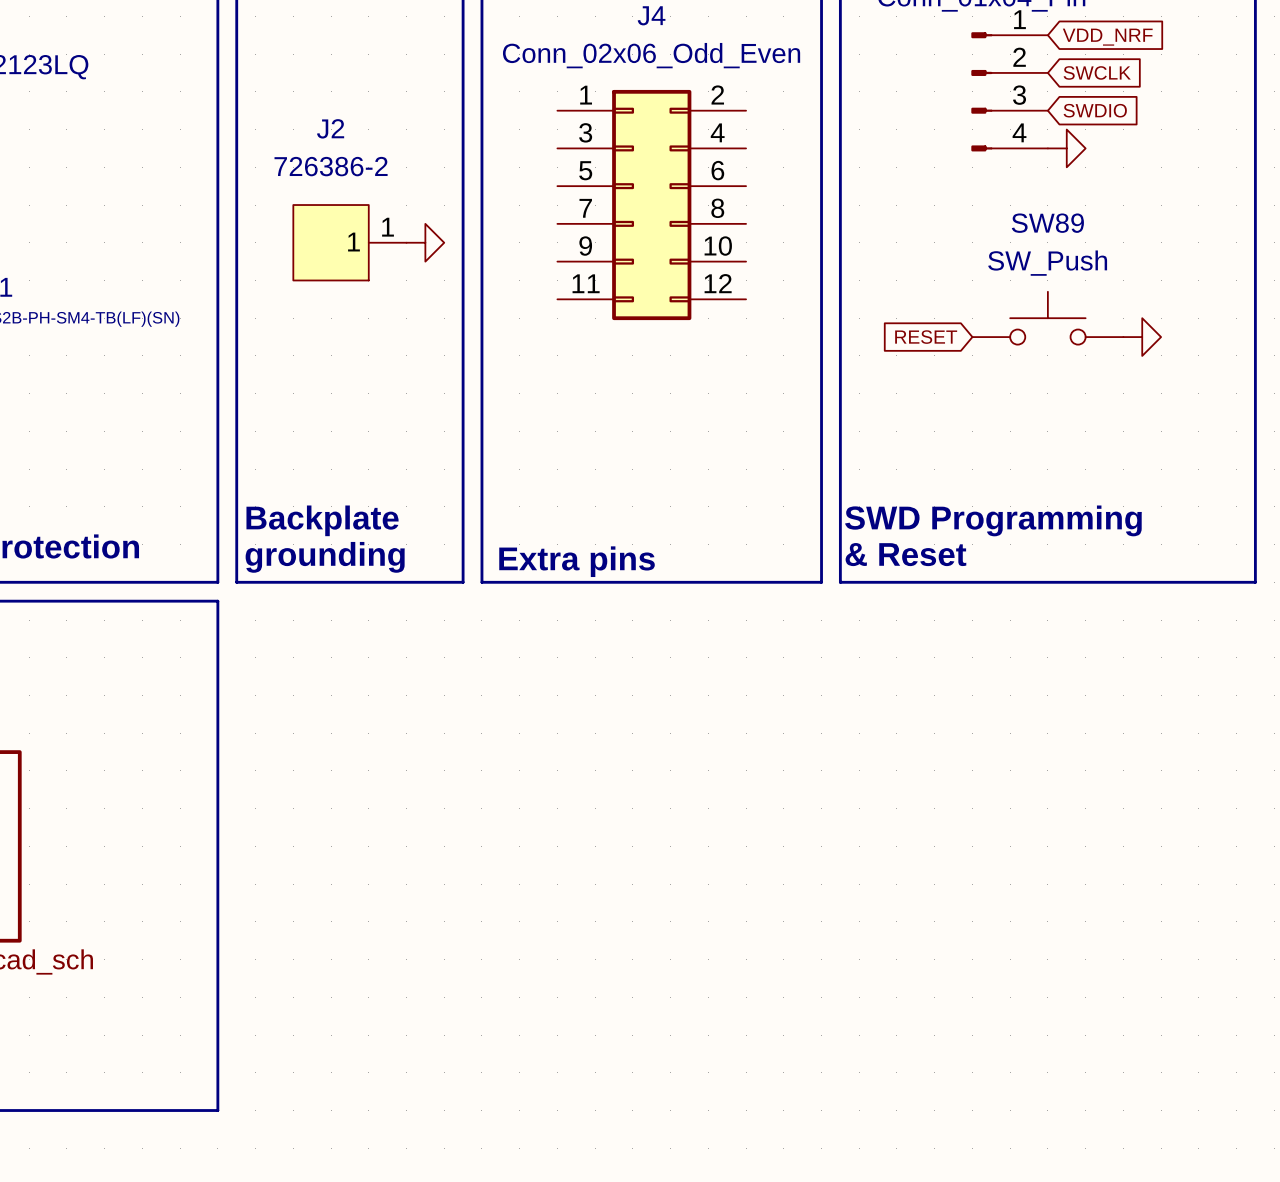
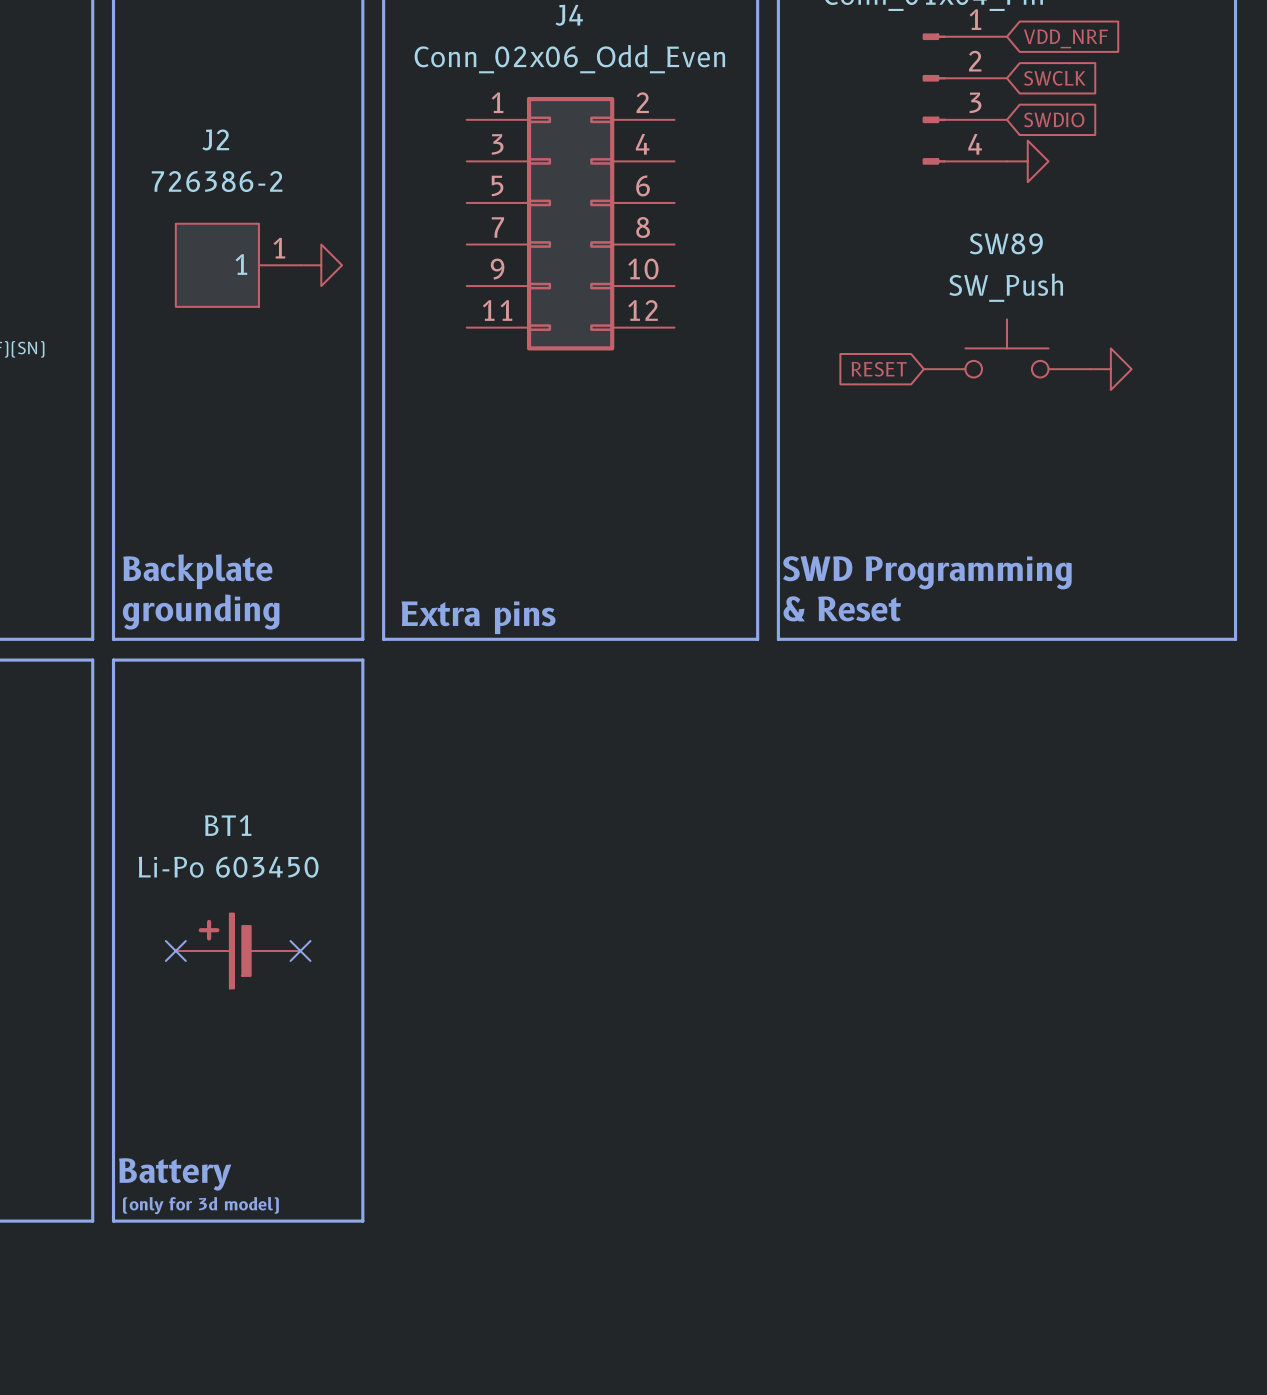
line: none -> (113, 660) (362, 660) (362, 1221) (113, 1221) (113, 660)
no-connect mark: none -> (175, 950)
BT1: none -> Li-Po 603450 (238, 950)
no-connect mark: none -> (300, 950)
text: none -> Battery (175, 1174)
text: none -> (only for 3d model) (200, 1205)

